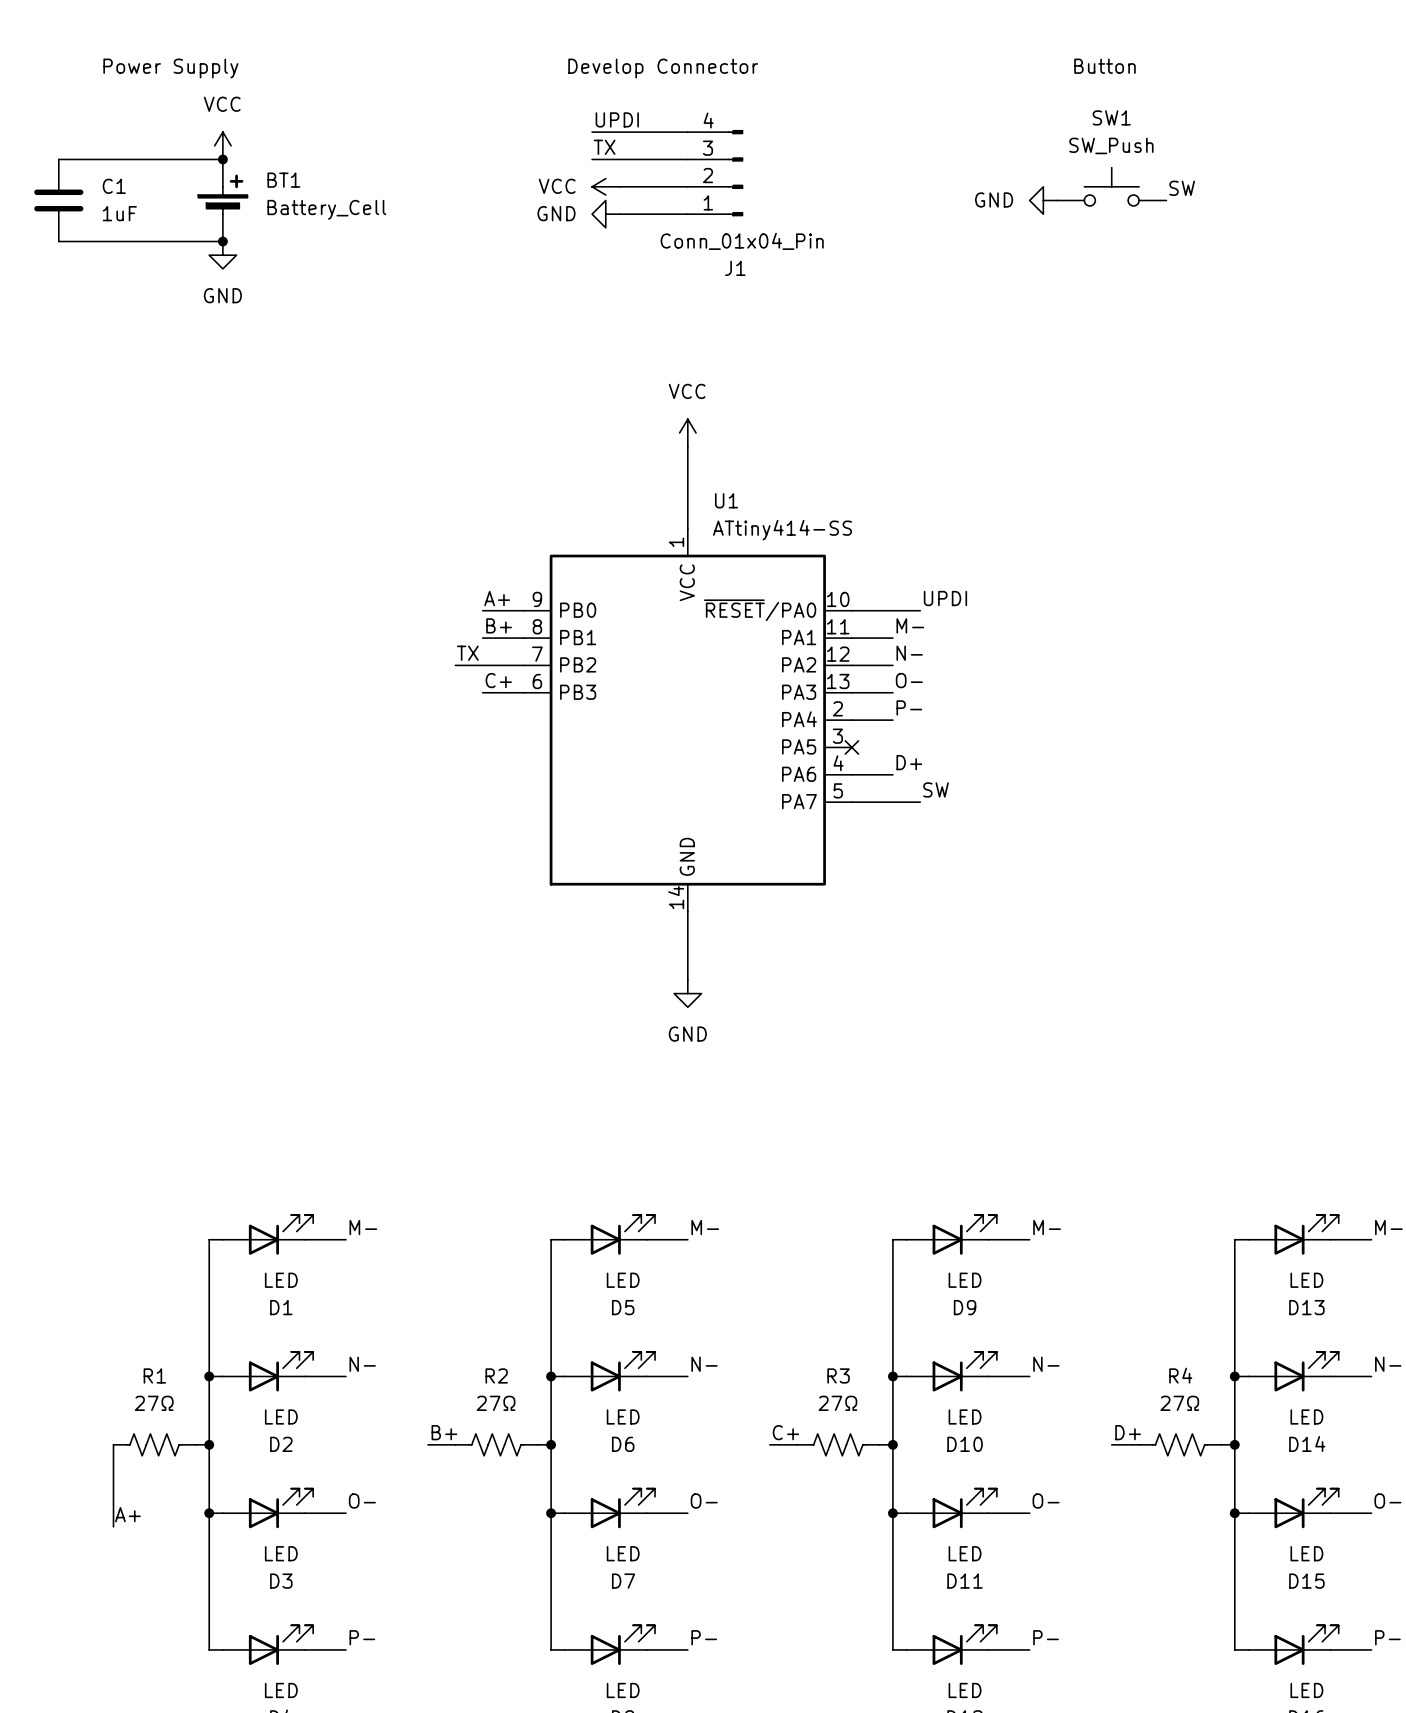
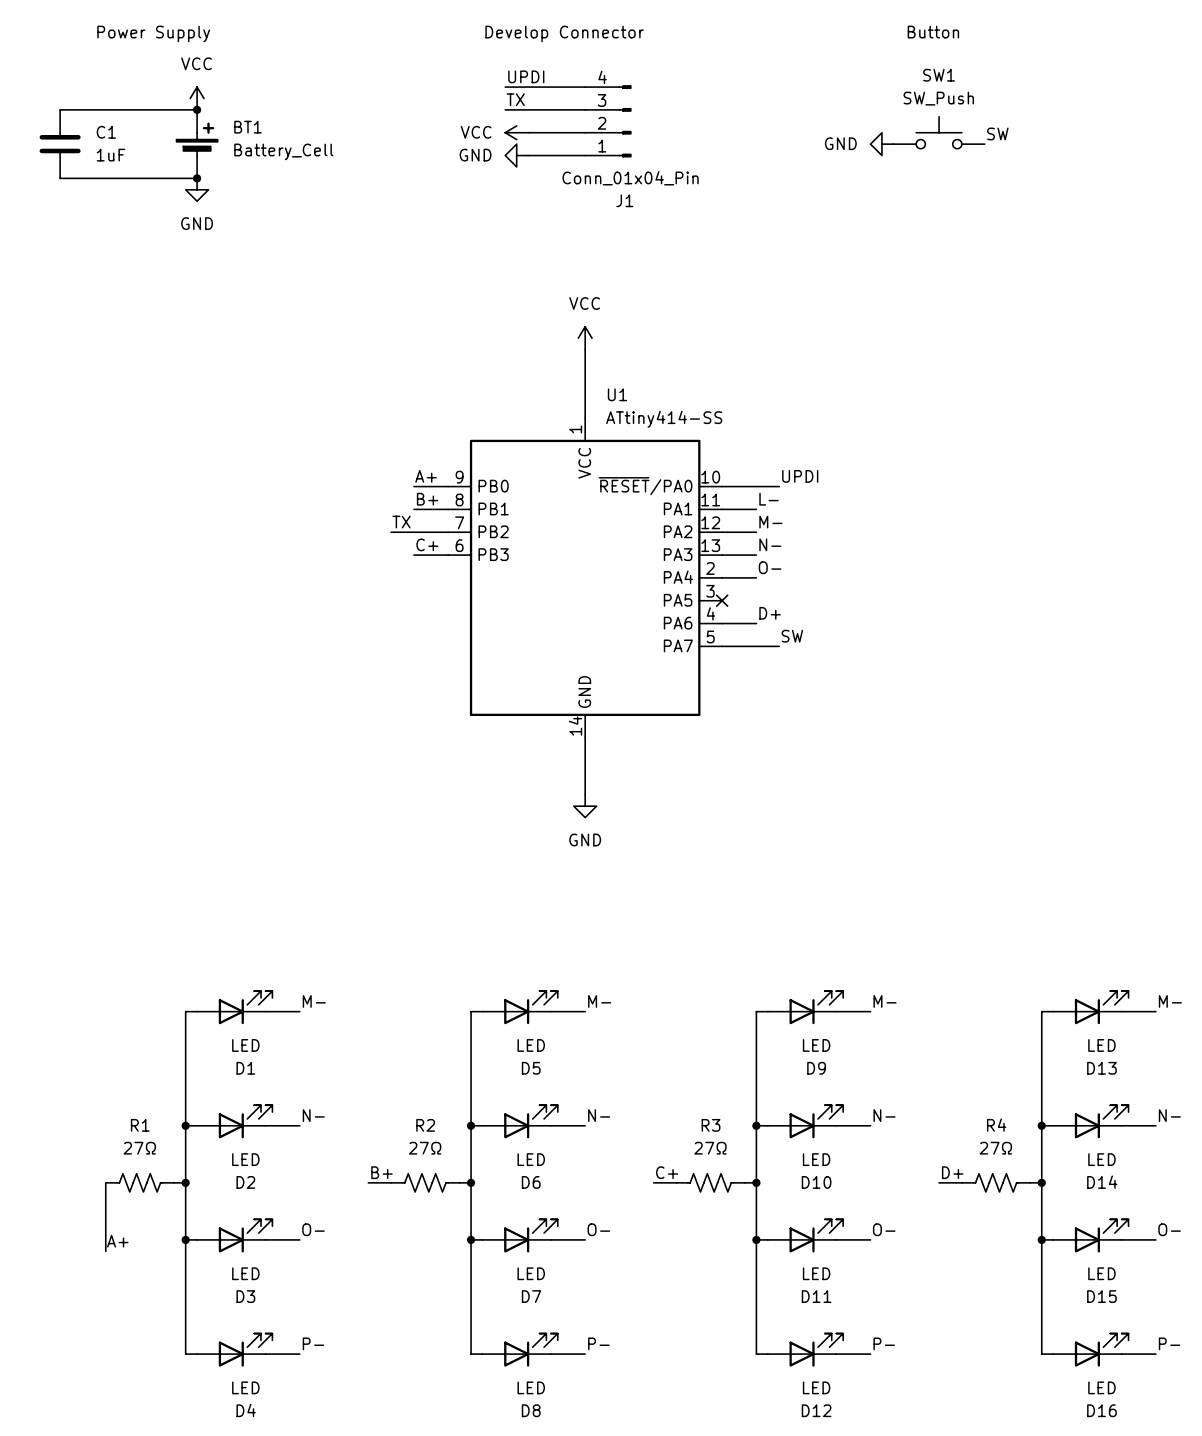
label: M- (910, 625) -> L- (768, 499)
label: N- (909, 653) -> M- (770, 522)
label: O- (909, 680) -> N- (770, 544)
label: P- (909, 707) -> O- (770, 567)

